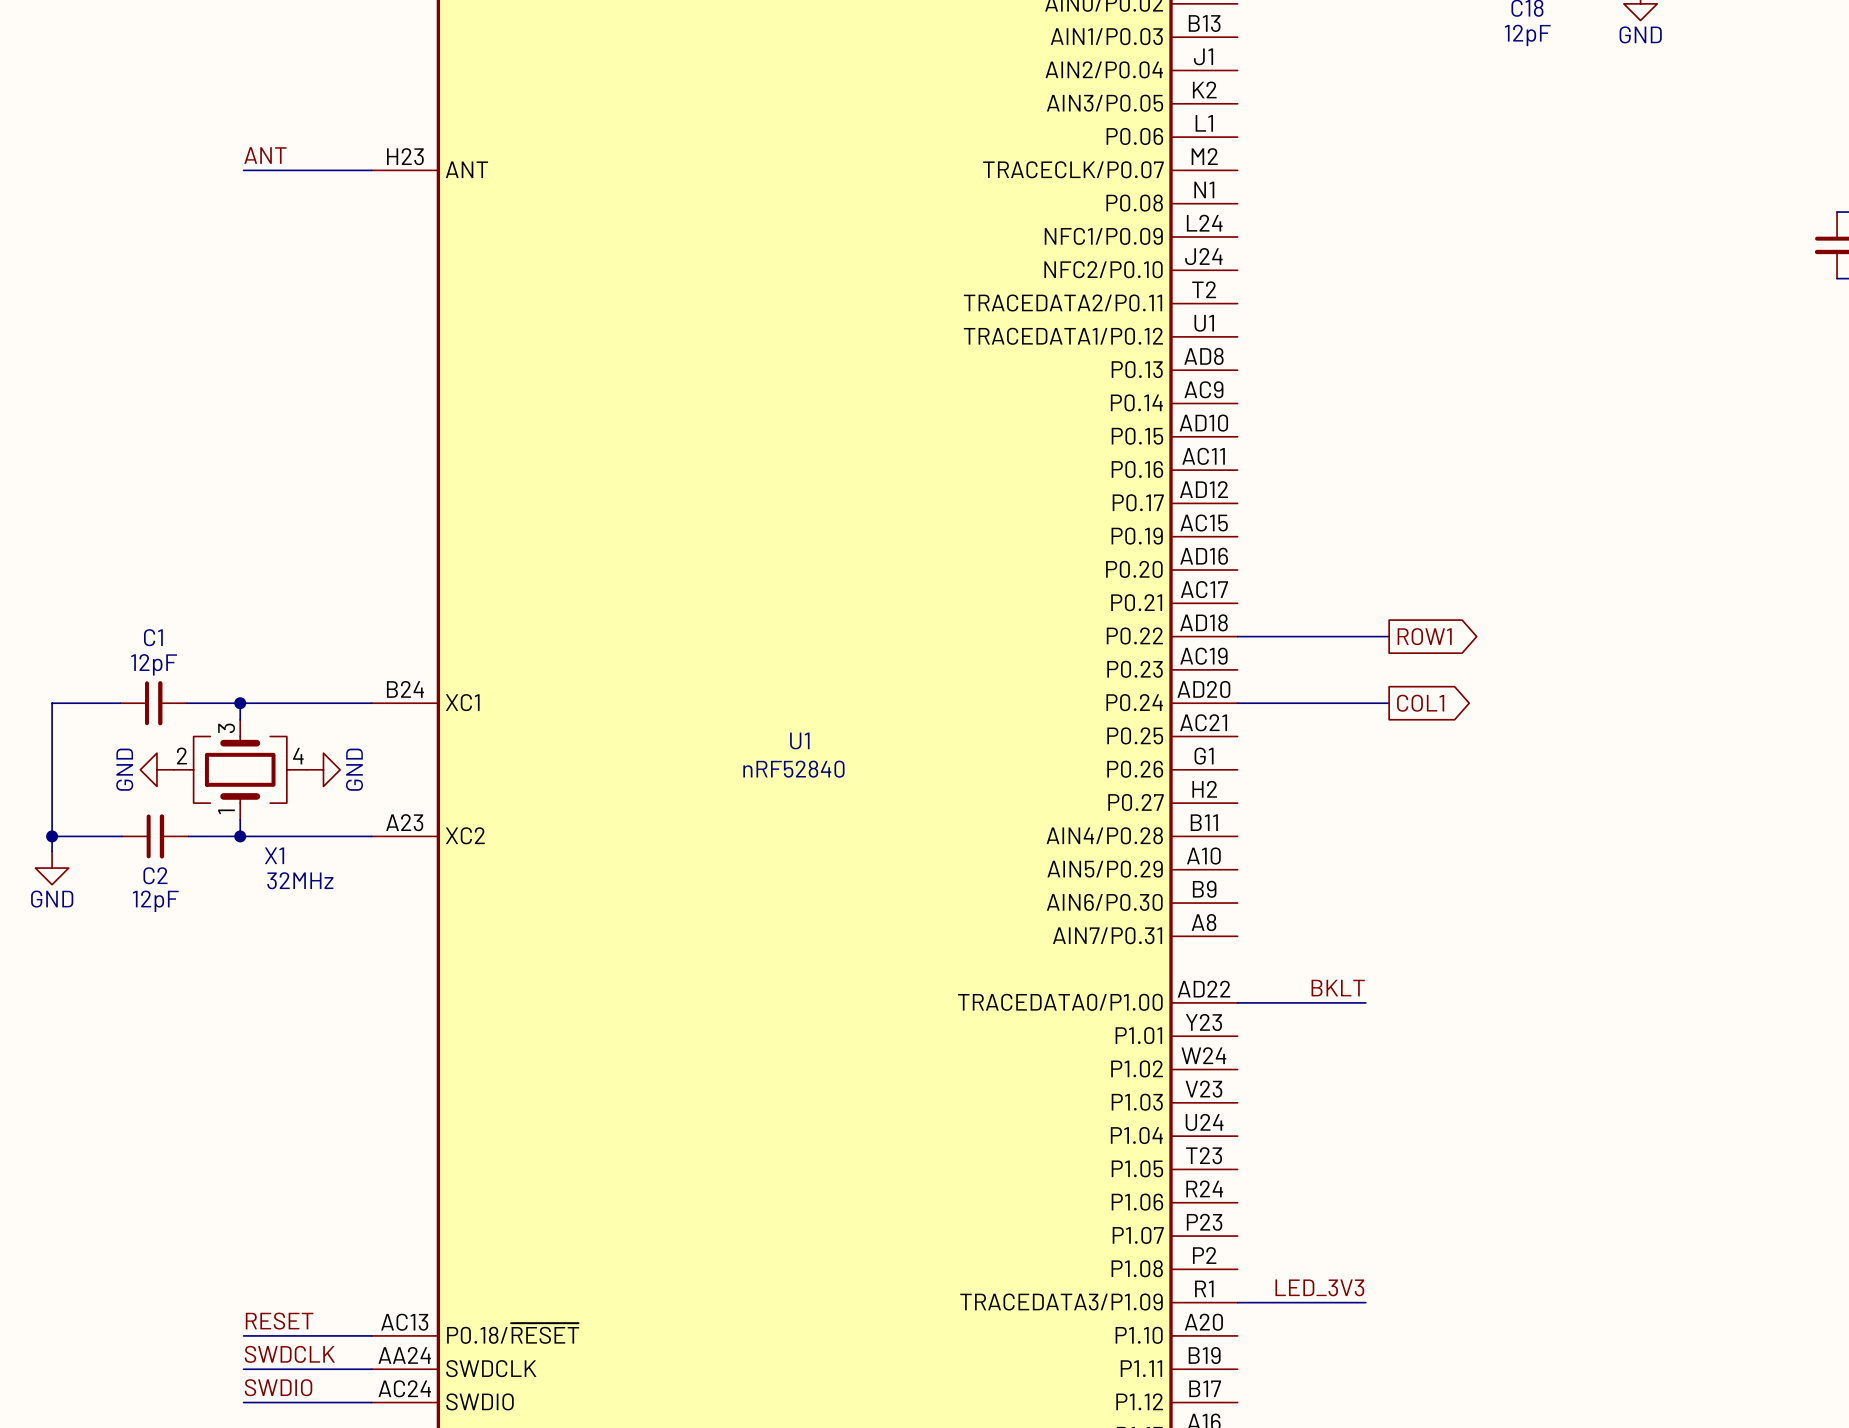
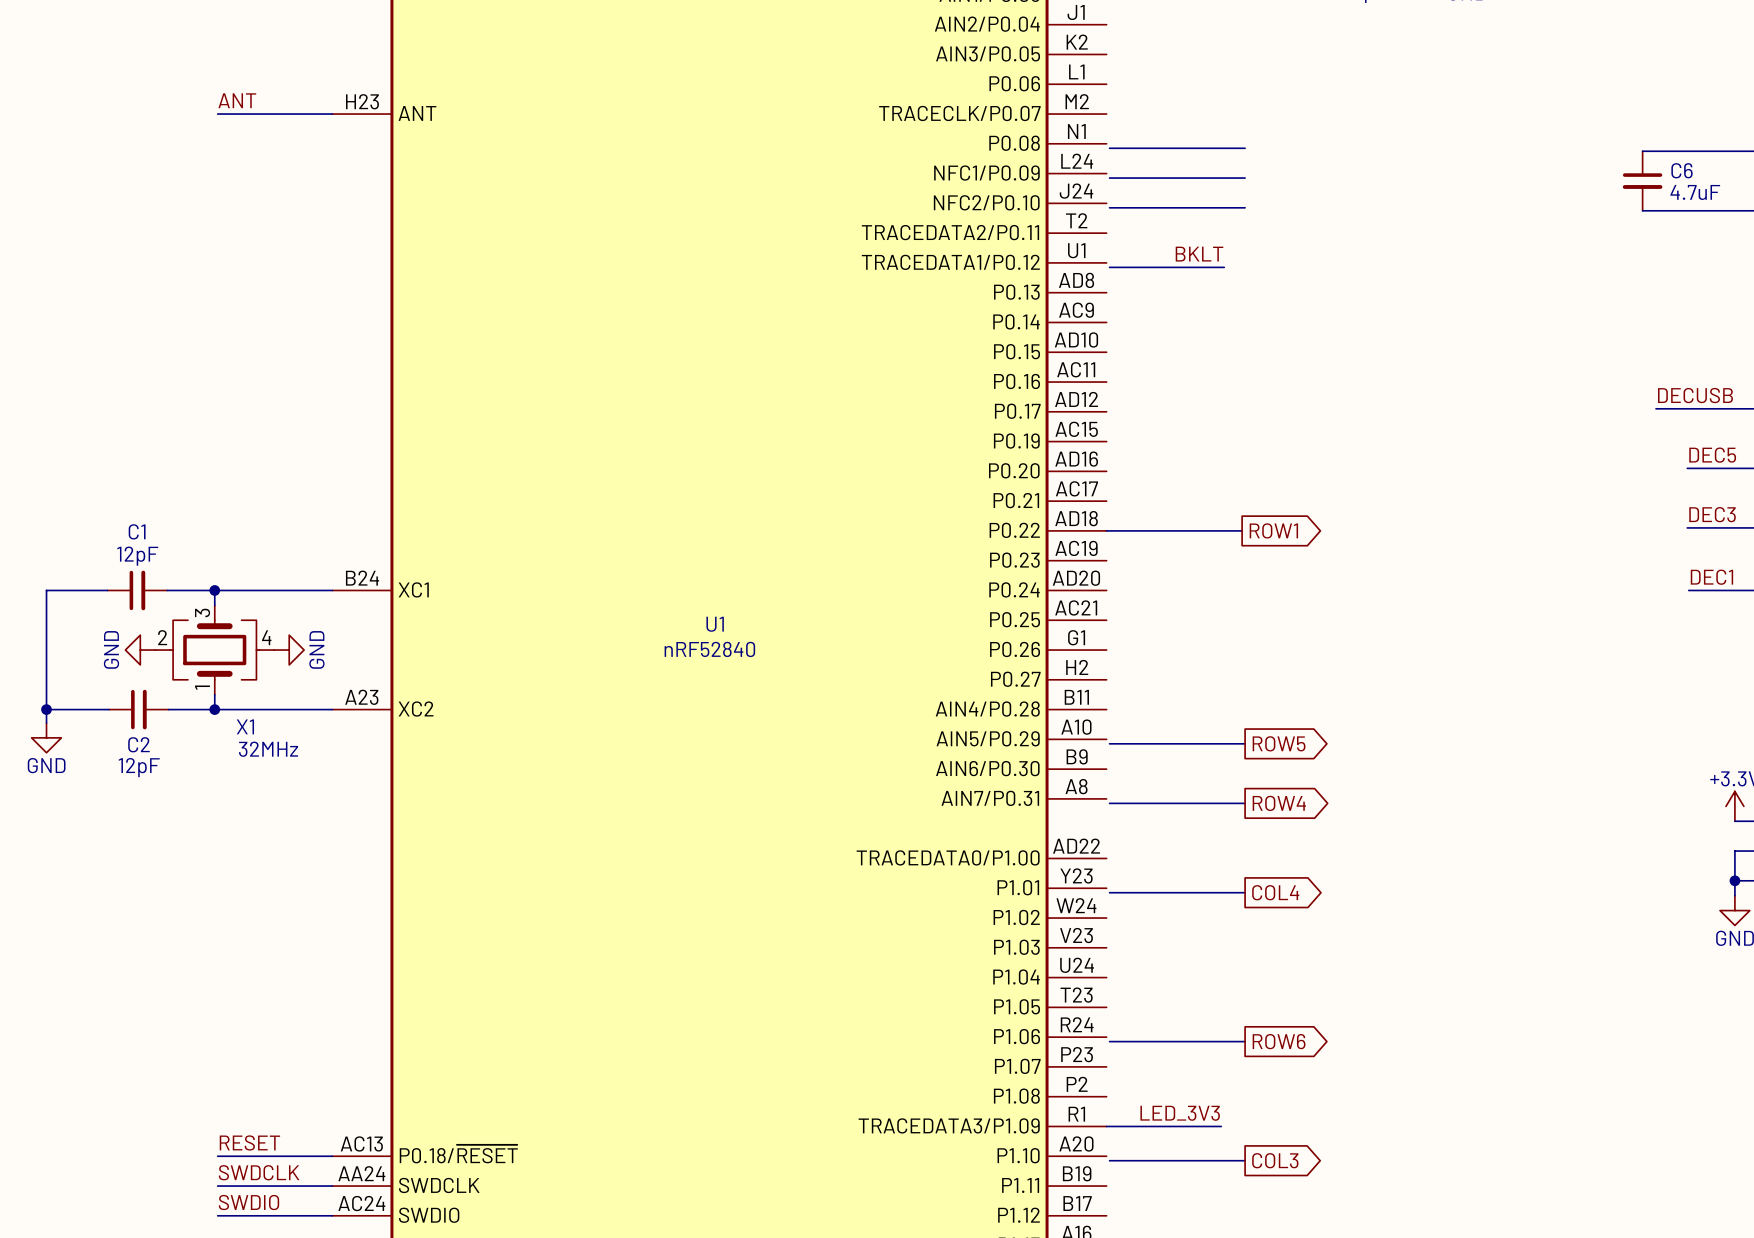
wire: none -> (1109, 148) (1245, 148)
wire: none -> (1109, 178) (1245, 178)
wire: none -> (1109, 207) (1245, 207)
label: none -> BKLT (1199, 254)
wire: none -> (1109, 267) (1224, 267)
wire: (1237, 703) (1389, 703) -> (1109, 743) (1245, 743)
global label: COL1 (1420, 703) -> none
global label: none -> ROW5 (1279, 743)
wire: none -> (1109, 803) (1245, 803)
global label: none -> ROW4 (1279, 803)
label: BKLT (1338, 988) -> none
wire: (1237, 1002) (1365, 1002) -> none
wire: none -> (1109, 892) (1245, 892)
global label: none -> COL4 (1275, 892)
wire: none -> (1109, 1041) (1245, 1041)
global label: none -> ROW6 (1279, 1041)
wire: none -> (1109, 1160) (1245, 1160)
global label: none -> COL3 (1275, 1160)

